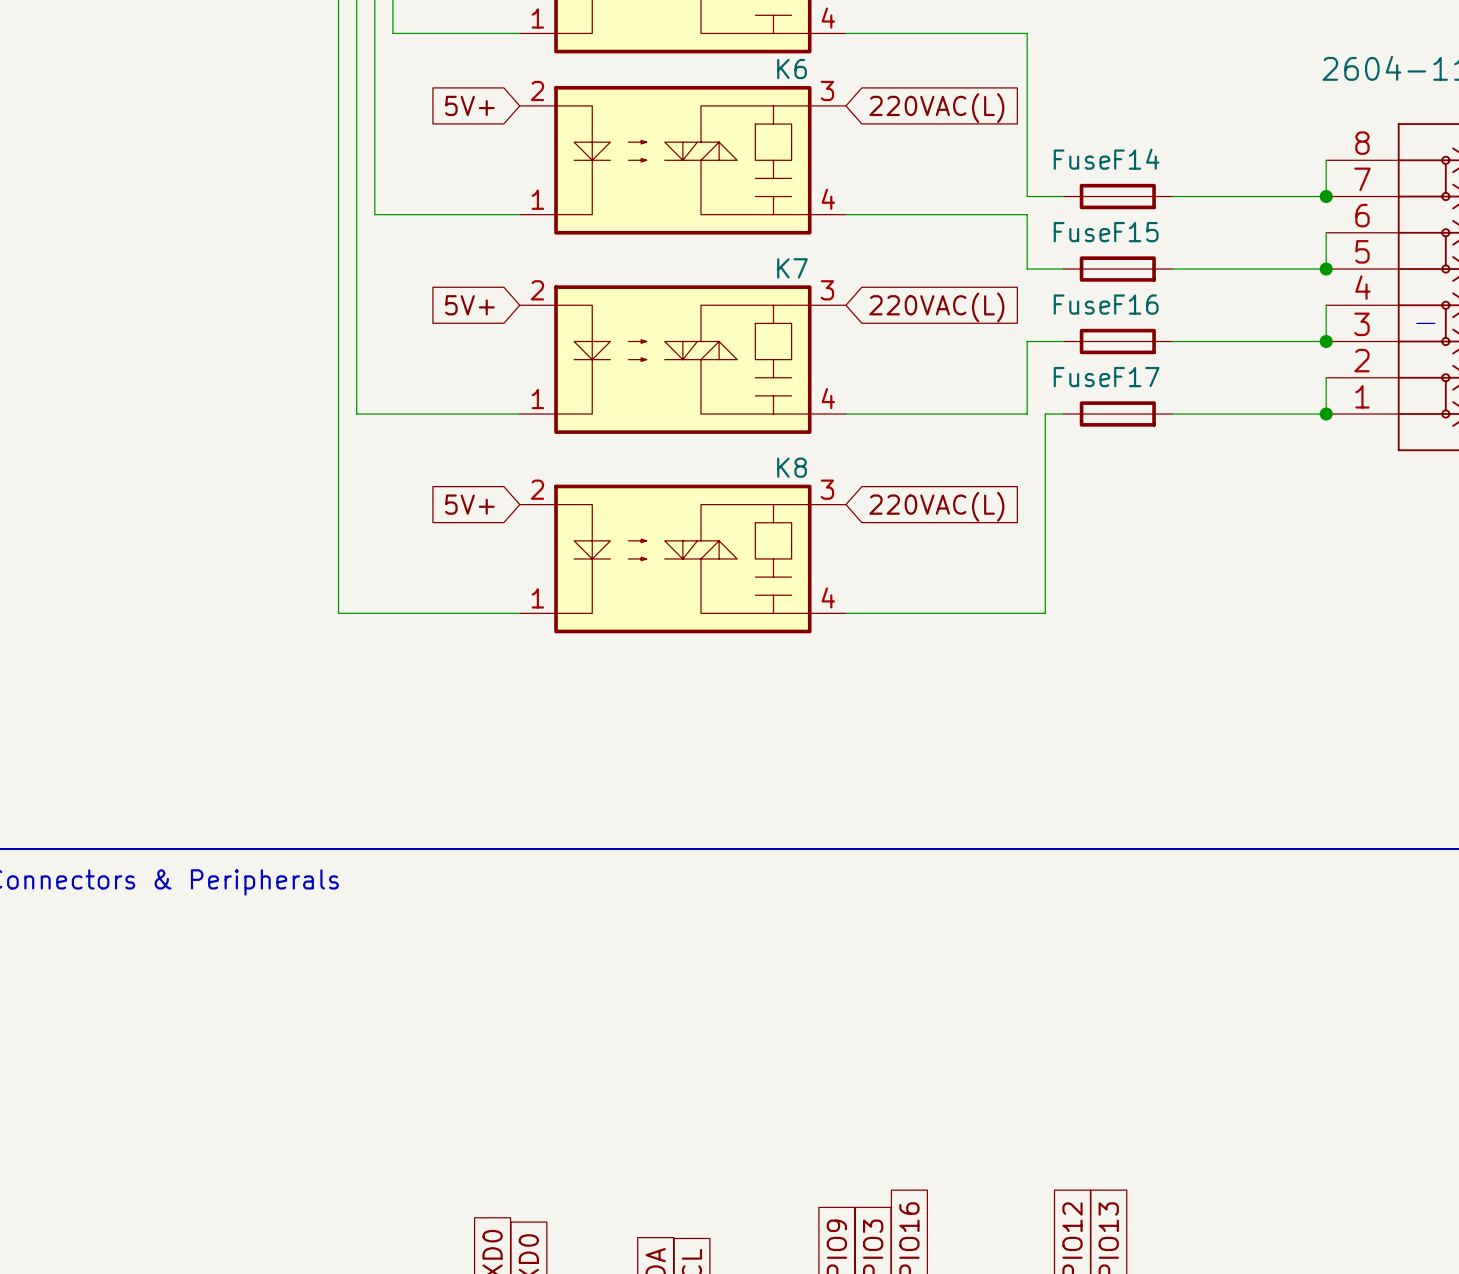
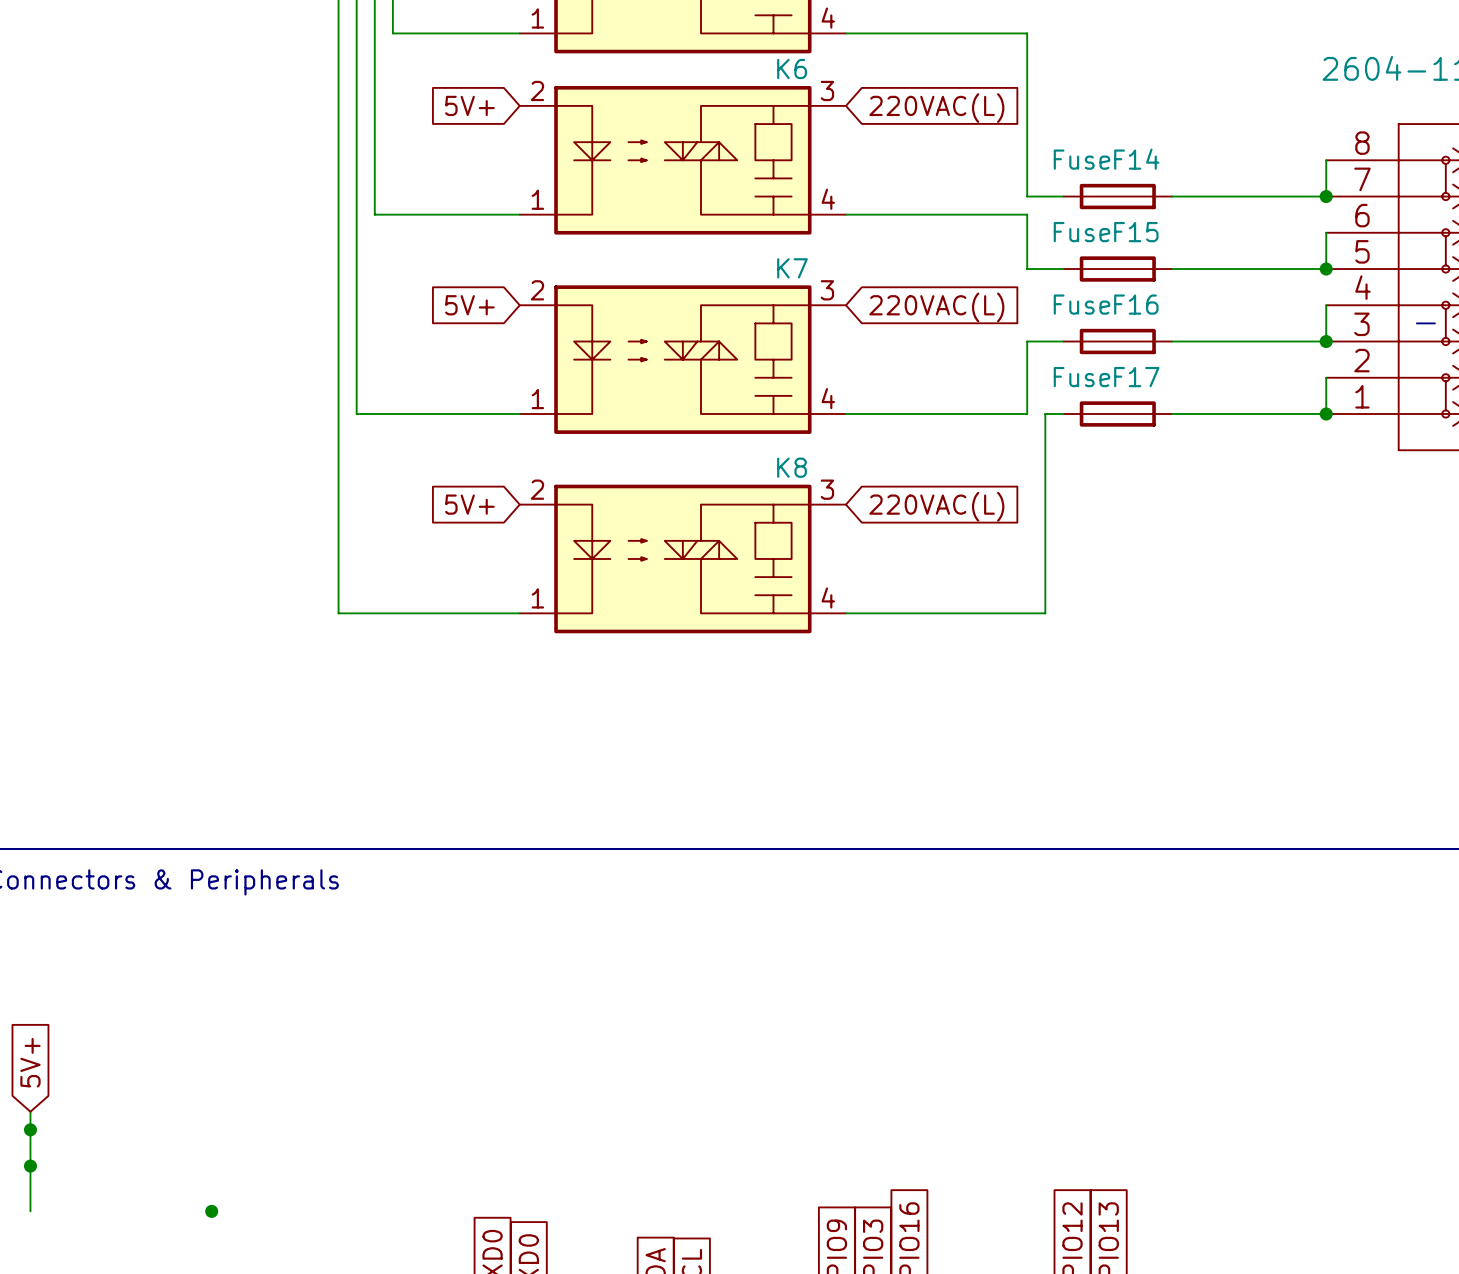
global label: none -> 5V+ (30, 1062)
wire: none -> (30, 1111) (30, 1211)
junction: none -> (30, 1129)
junction: none -> (30, 1166)
junction: none -> (211, 1211)

